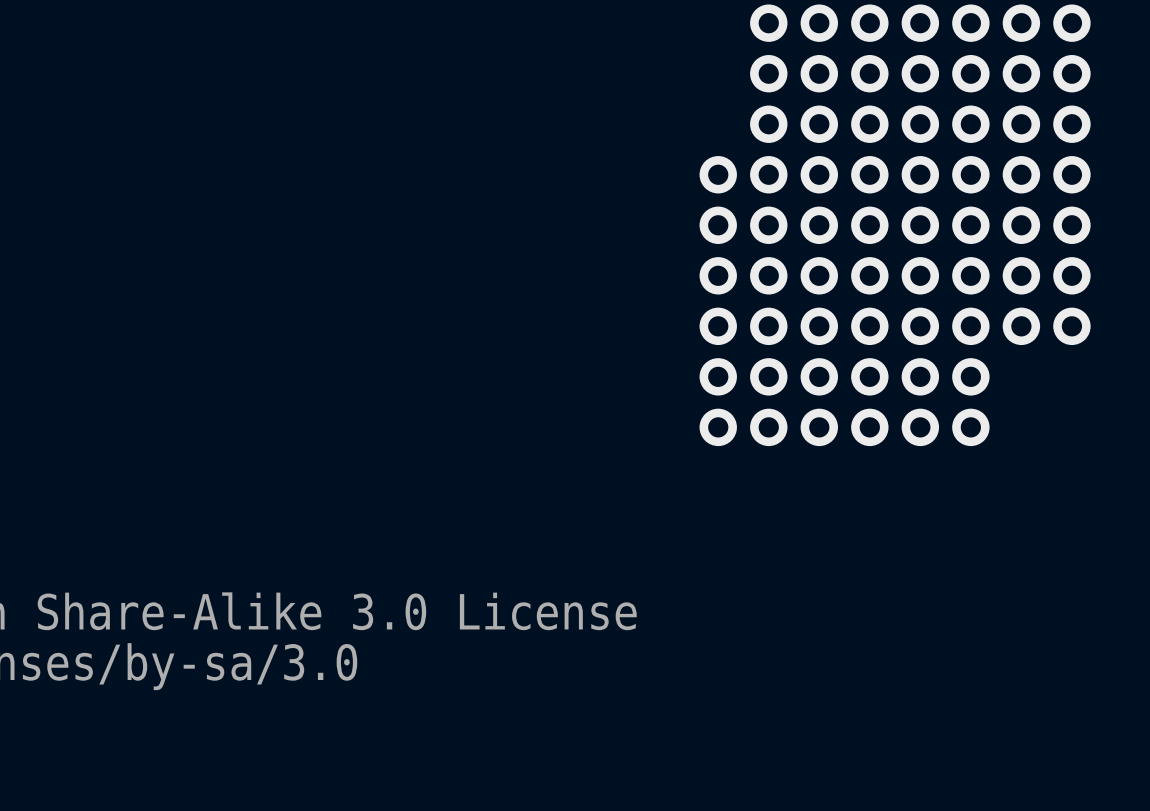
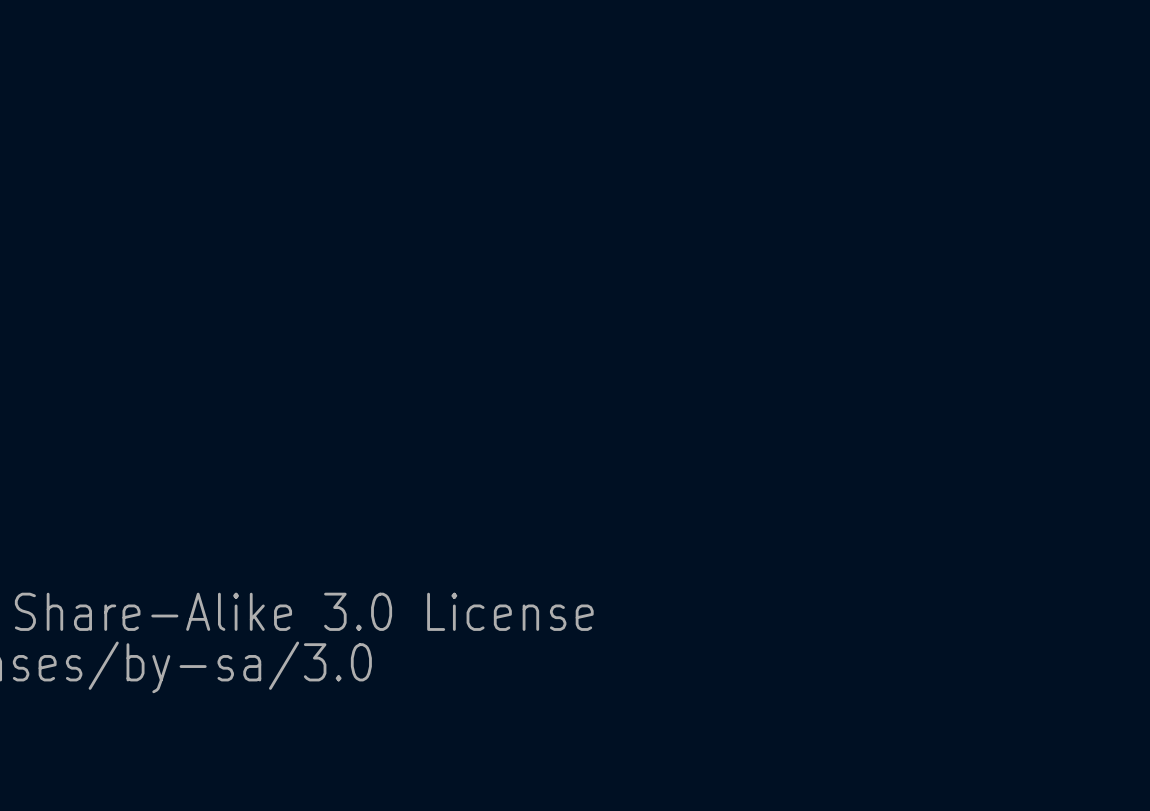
via: (768, 23) -> none
via: (819, 23) -> none
via: (869, 23) -> none
via: (920, 23) -> none
via: (970, 23) -> none
via: (1021, 23) -> none
via: (1071, 23) -> none
via: (768, 73) -> none
via: (819, 73) -> none
via: (869, 73) -> none
via: (920, 73) -> none
via: (970, 73) -> none
via: (1021, 73) -> none
via: (1071, 73) -> none
via: (768, 124) -> none
via: (819, 124) -> none
via: (869, 124) -> none
via: (920, 124) -> none
via: (970, 124) -> none
via: (1021, 124) -> none
via: (1071, 124) -> none
via: (718, 174) -> none
via: (768, 174) -> none
via: (819, 174) -> none
via: (869, 174) -> none
via: (920, 174) -> none
via: (970, 174) -> none
via: (1021, 174) -> none
via: (1071, 174) -> none
via: (718, 225) -> none
via: (768, 225) -> none
via: (819, 225) -> none
via: (869, 225) -> none
via: (920, 225) -> none
via: (970, 225) -> none
via: (1021, 225) -> none
via: (1071, 225) -> none
via: (718, 275) -> none
via: (768, 275) -> none
via: (819, 275) -> none
via: (869, 275) -> none
via: (920, 275) -> none
via: (970, 275) -> none
via: (1021, 275) -> none
via: (1071, 275) -> none
via: (718, 326) -> none
via: (768, 326) -> none
via: (819, 326) -> none
via: (869, 326) -> none
via: (920, 326) -> none
via: (970, 326) -> none
via: (1021, 326) -> none
via: (1071, 326) -> none
via: (718, 376) -> none
via: (768, 376) -> none
via: (819, 376) -> none
via: (869, 376) -> none
via: (920, 376) -> none
via: (970, 376) -> none
via: (718, 427) -> none
via: (768, 427) -> none
via: (819, 427) -> none
via: (869, 427) -> none
via: (920, 427) -> none
via: (970, 427) -> none

